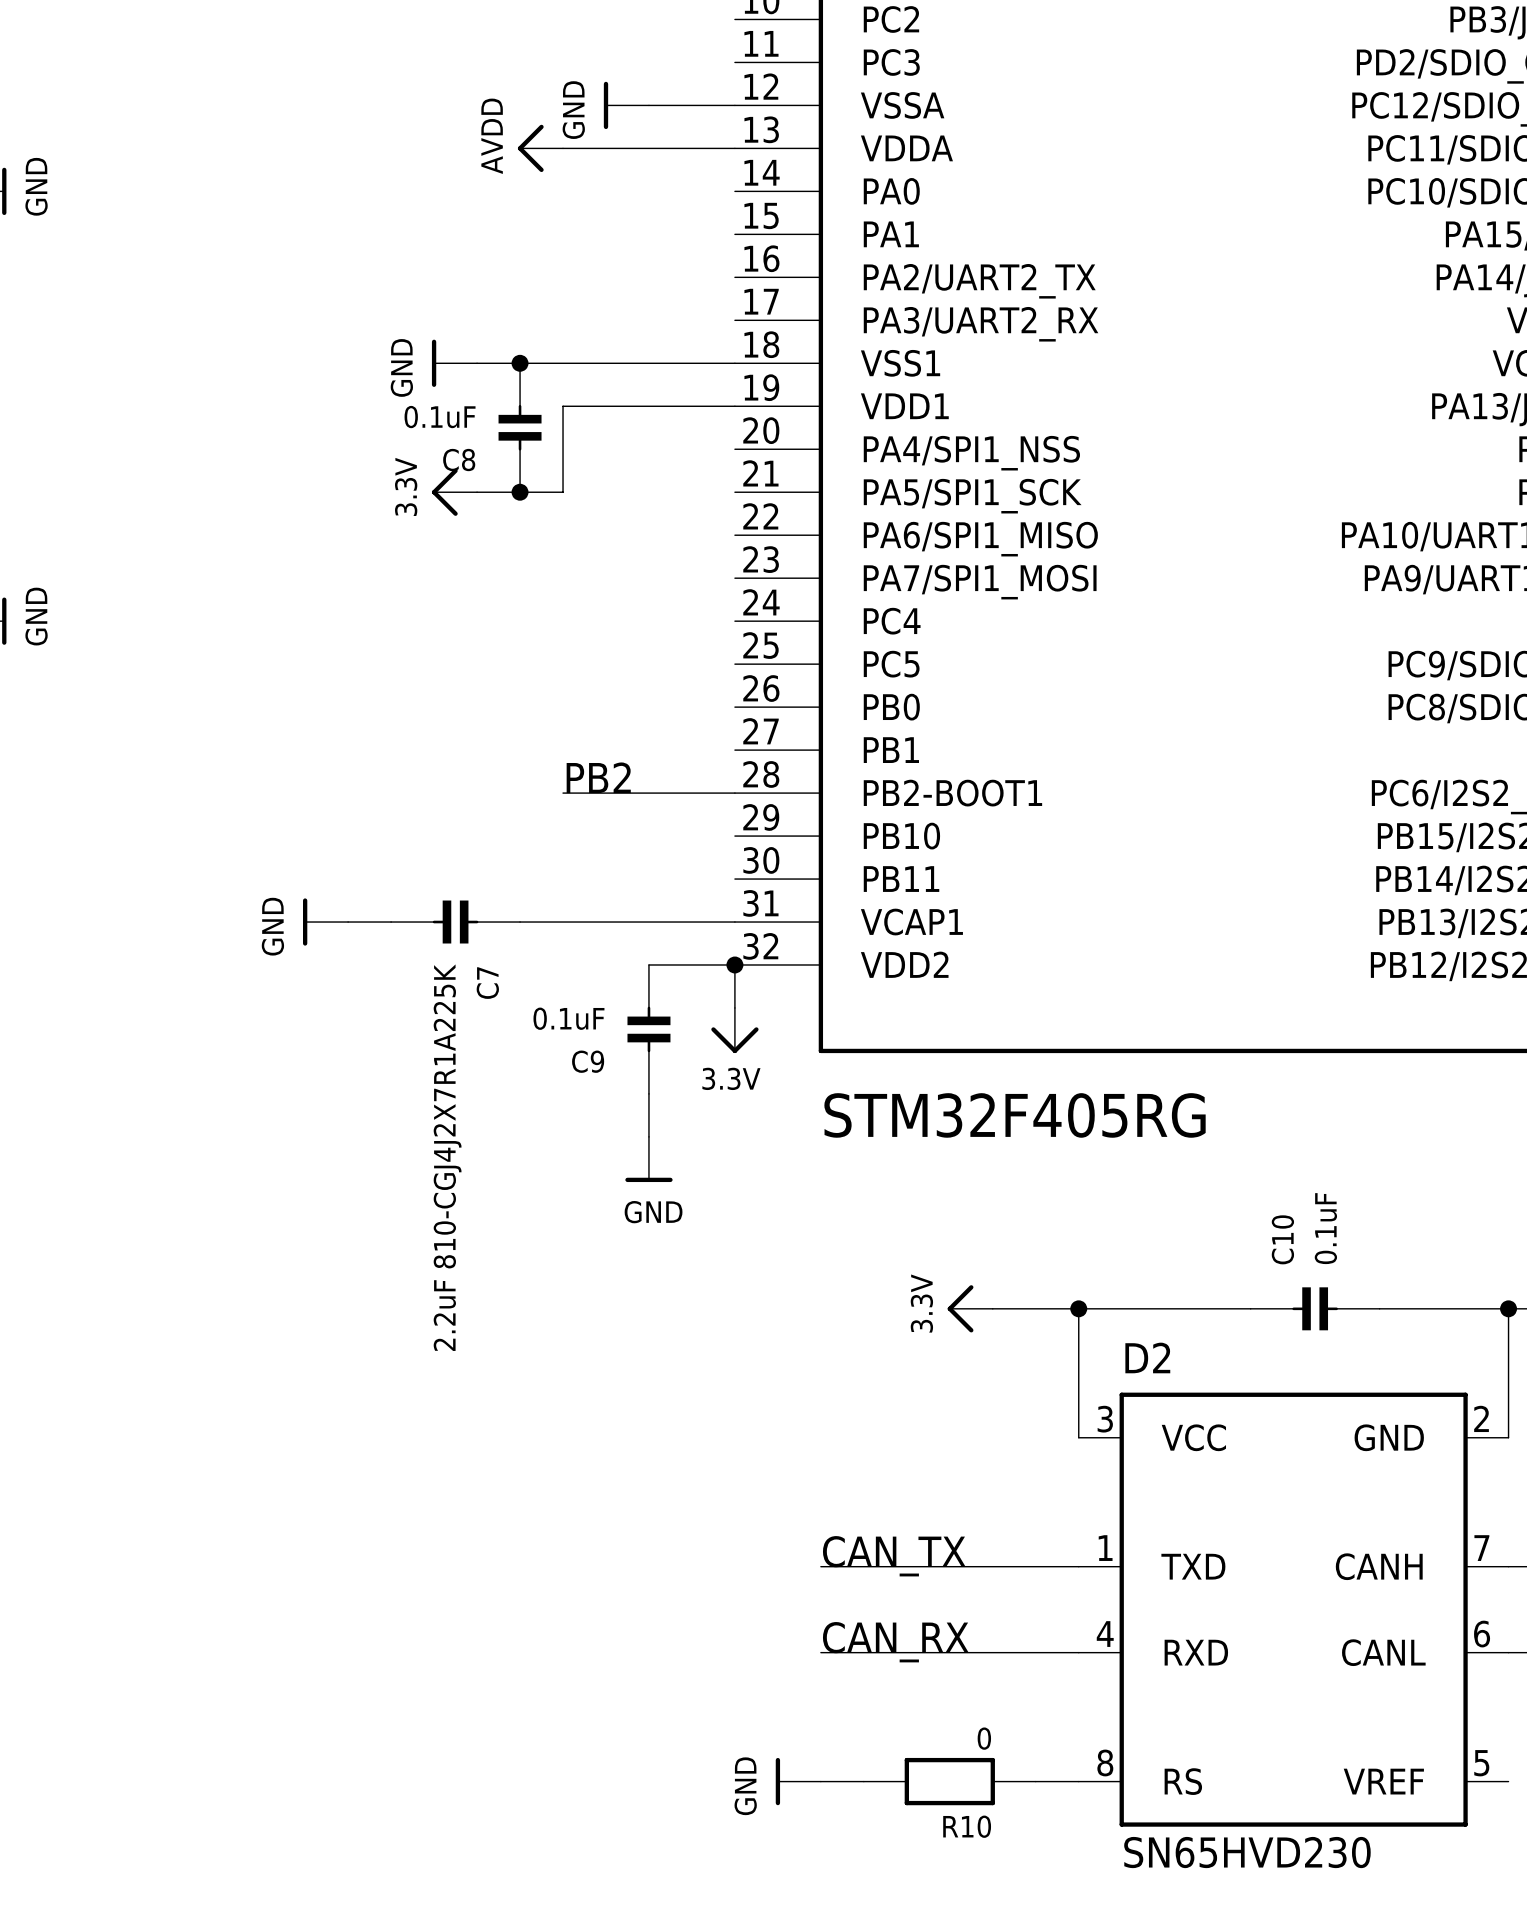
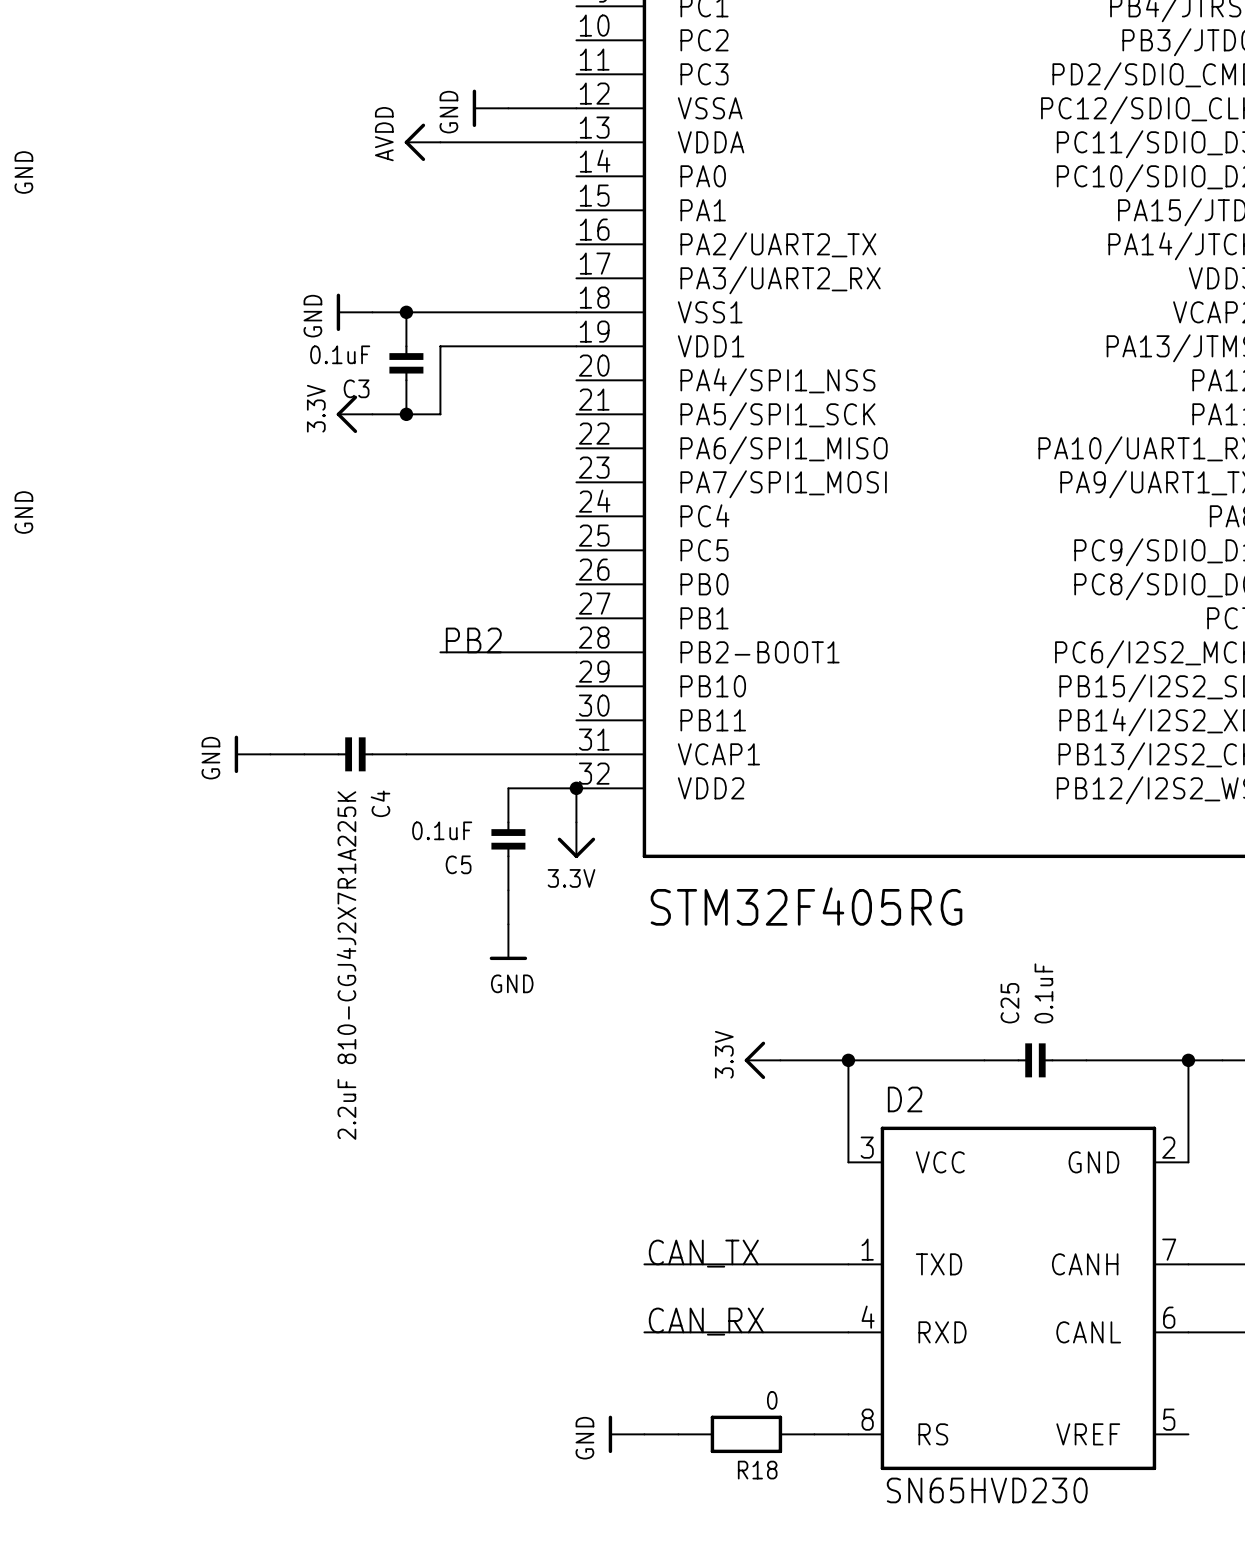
C8 name: C8 (459, 460) -> C3 (356, 388)
C7 name: C7 (487, 983) -> C4 (380, 803)
C9 name: C9 (588, 1061) -> C5 (458, 864)
C10 name: C10 (1282, 1239) -> C25 (1009, 1003)
R10 name: R10 (967, 1826) -> R18 (757, 1470)

